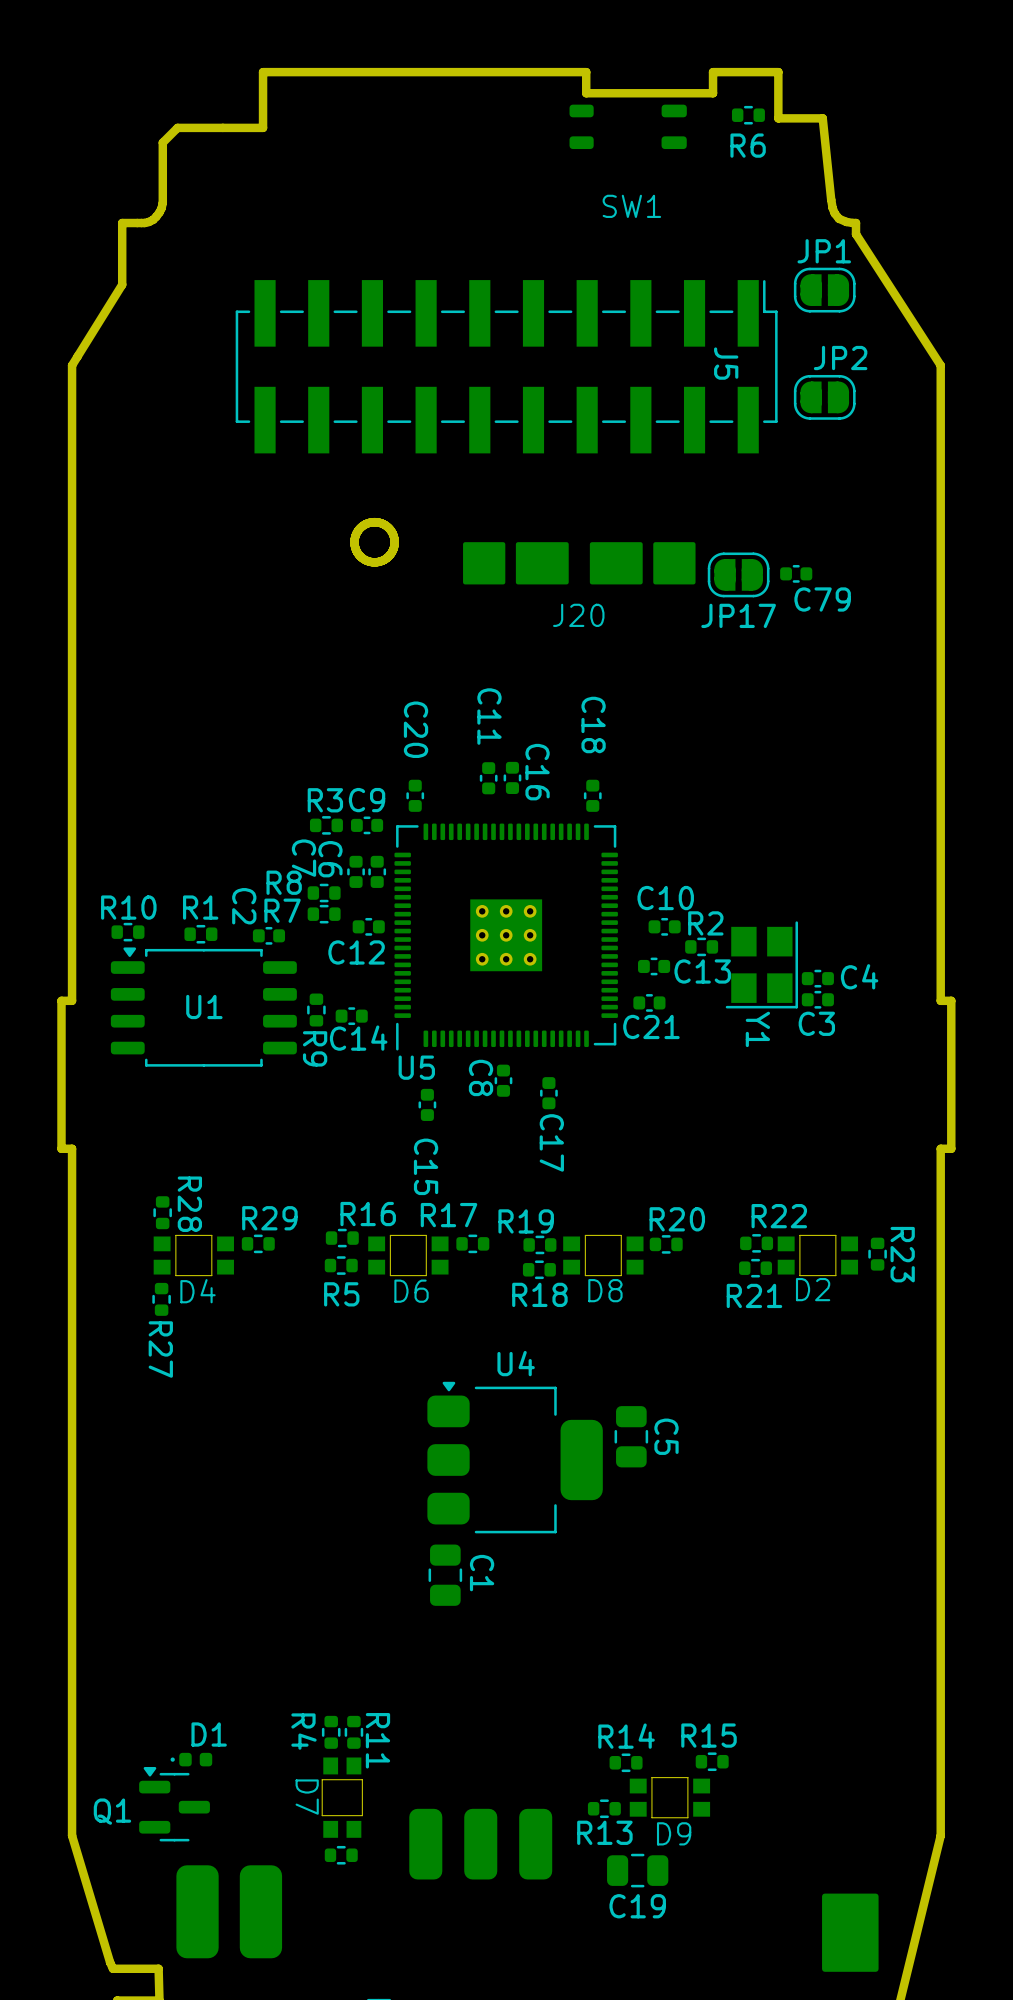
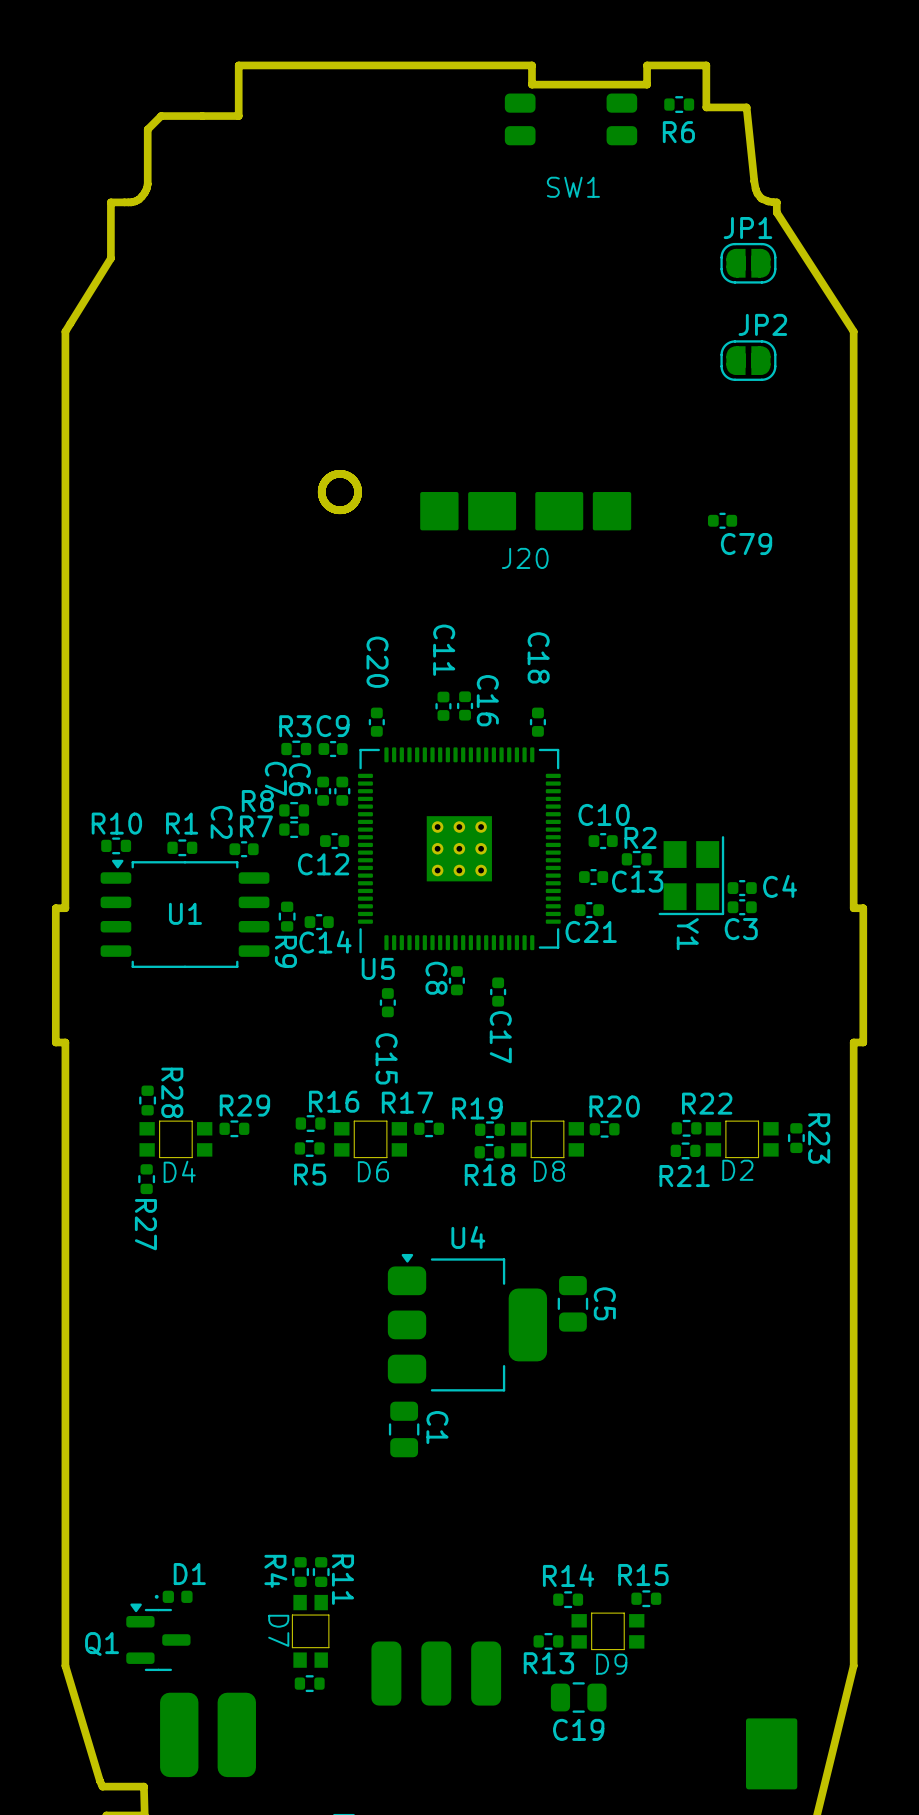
SW1 footprint: [569, 104, 687, 150] -> [504, 93, 638, 146]
J5: (506, 366) -> none
JP17: (738, 574) -> none

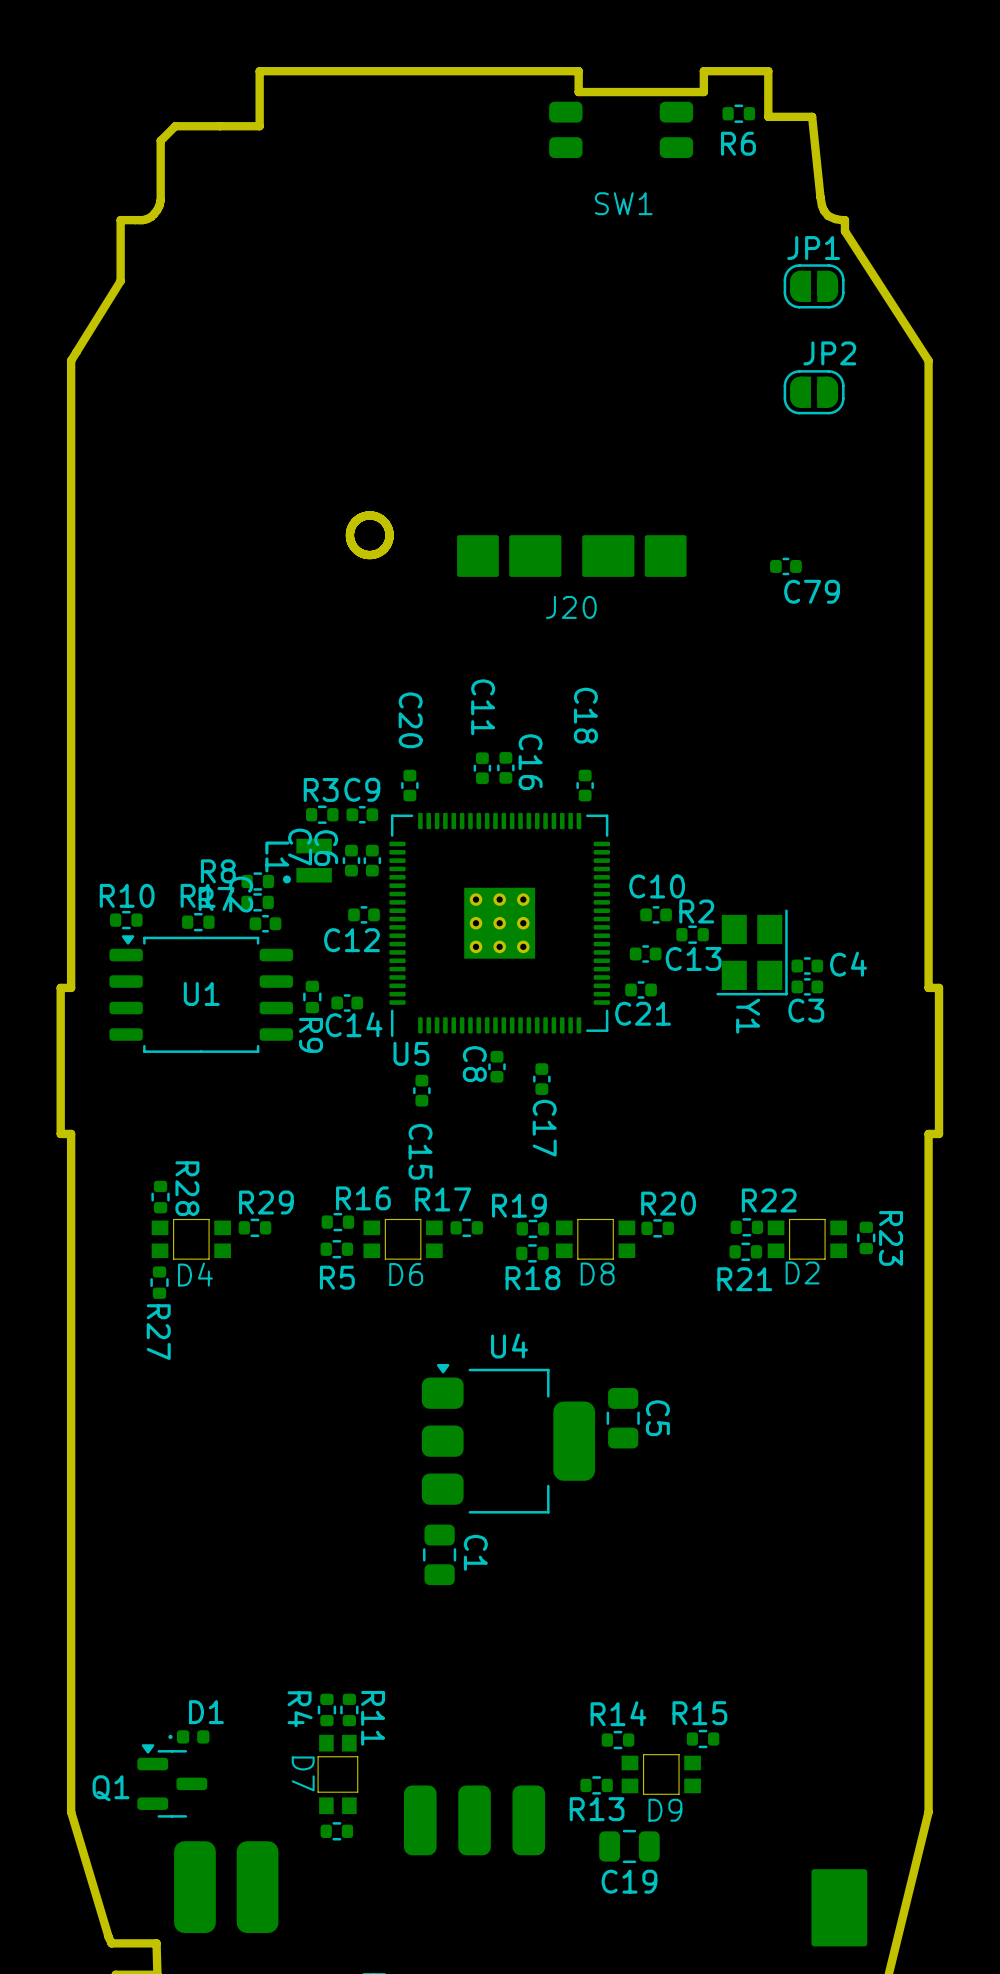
L1: none -> (307, 861)
R8 position: (294, 810) -> (257, 881)
R7 position: (294, 829) -> (257, 902)

